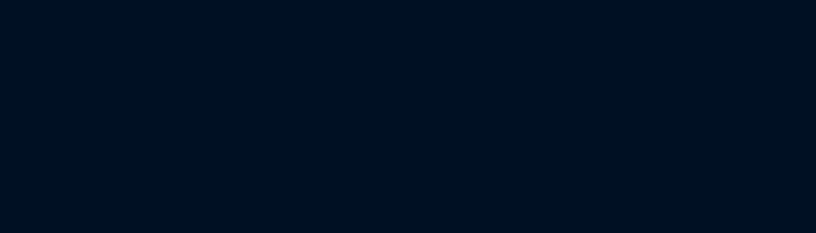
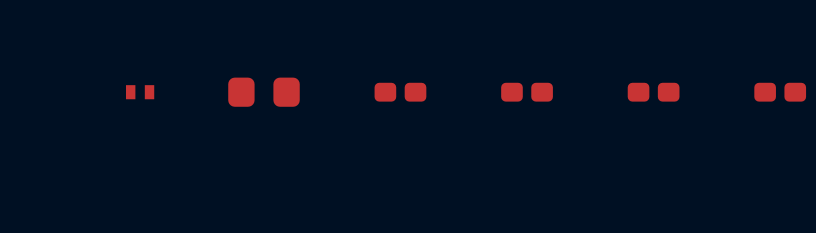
part: none -> (140, 92)
part: none -> (263, 92)
part: none -> (400, 92)
part: none -> (527, 92)
part: none -> (653, 92)
part: none -> (780, 92)

